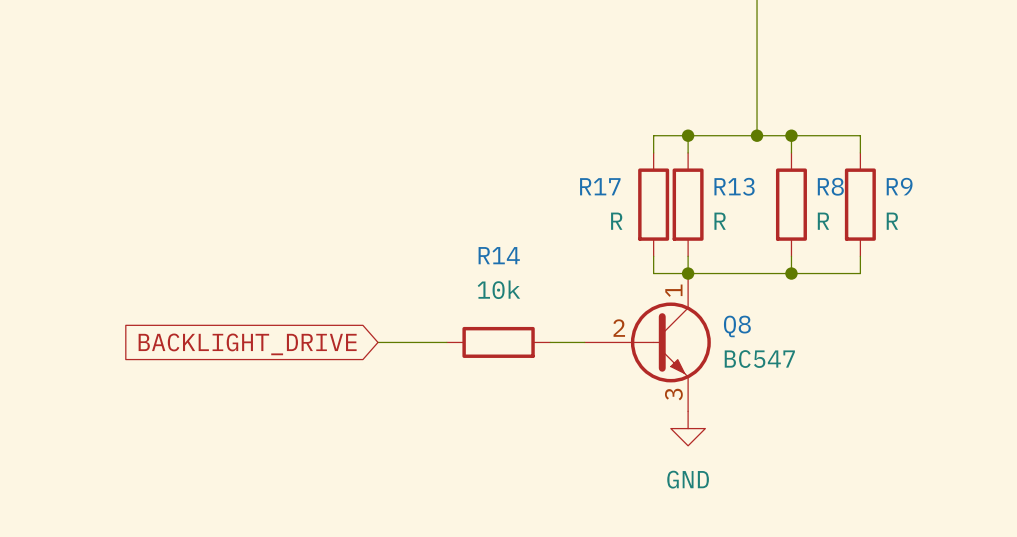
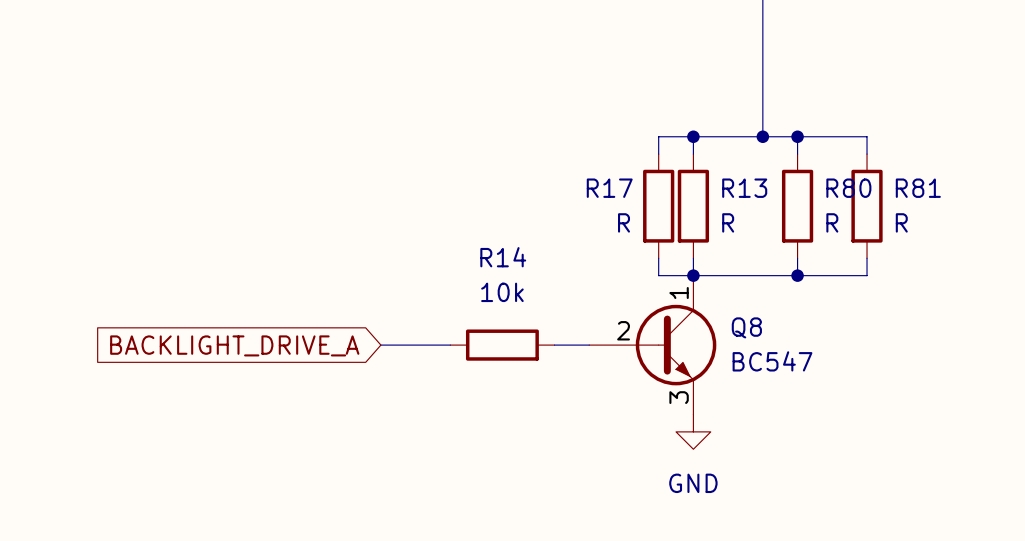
R8 name: R8 (830, 186) -> R80 (848, 188)
R9 name: R9 (899, 186) -> R81 (918, 188)
global label: BACKLIGHT_DRIVE (247, 344) -> BACKLIGHT_DRIVE_A (234, 345)

